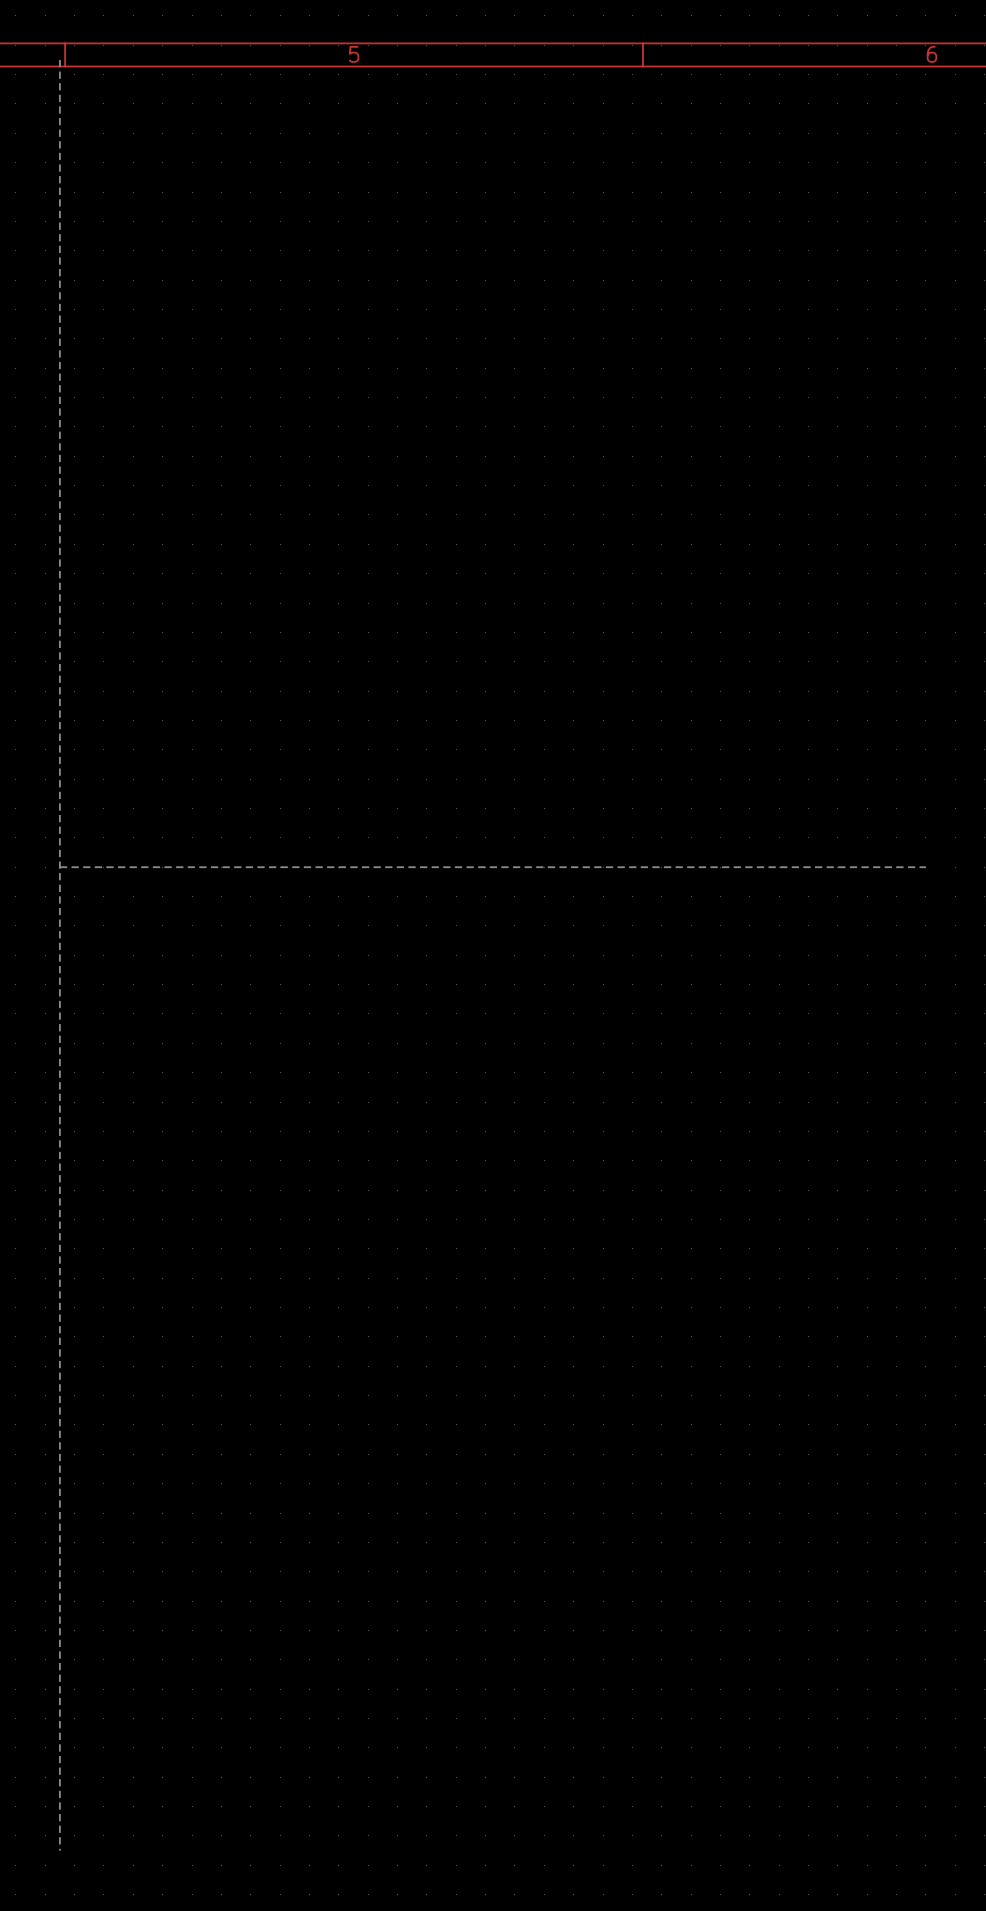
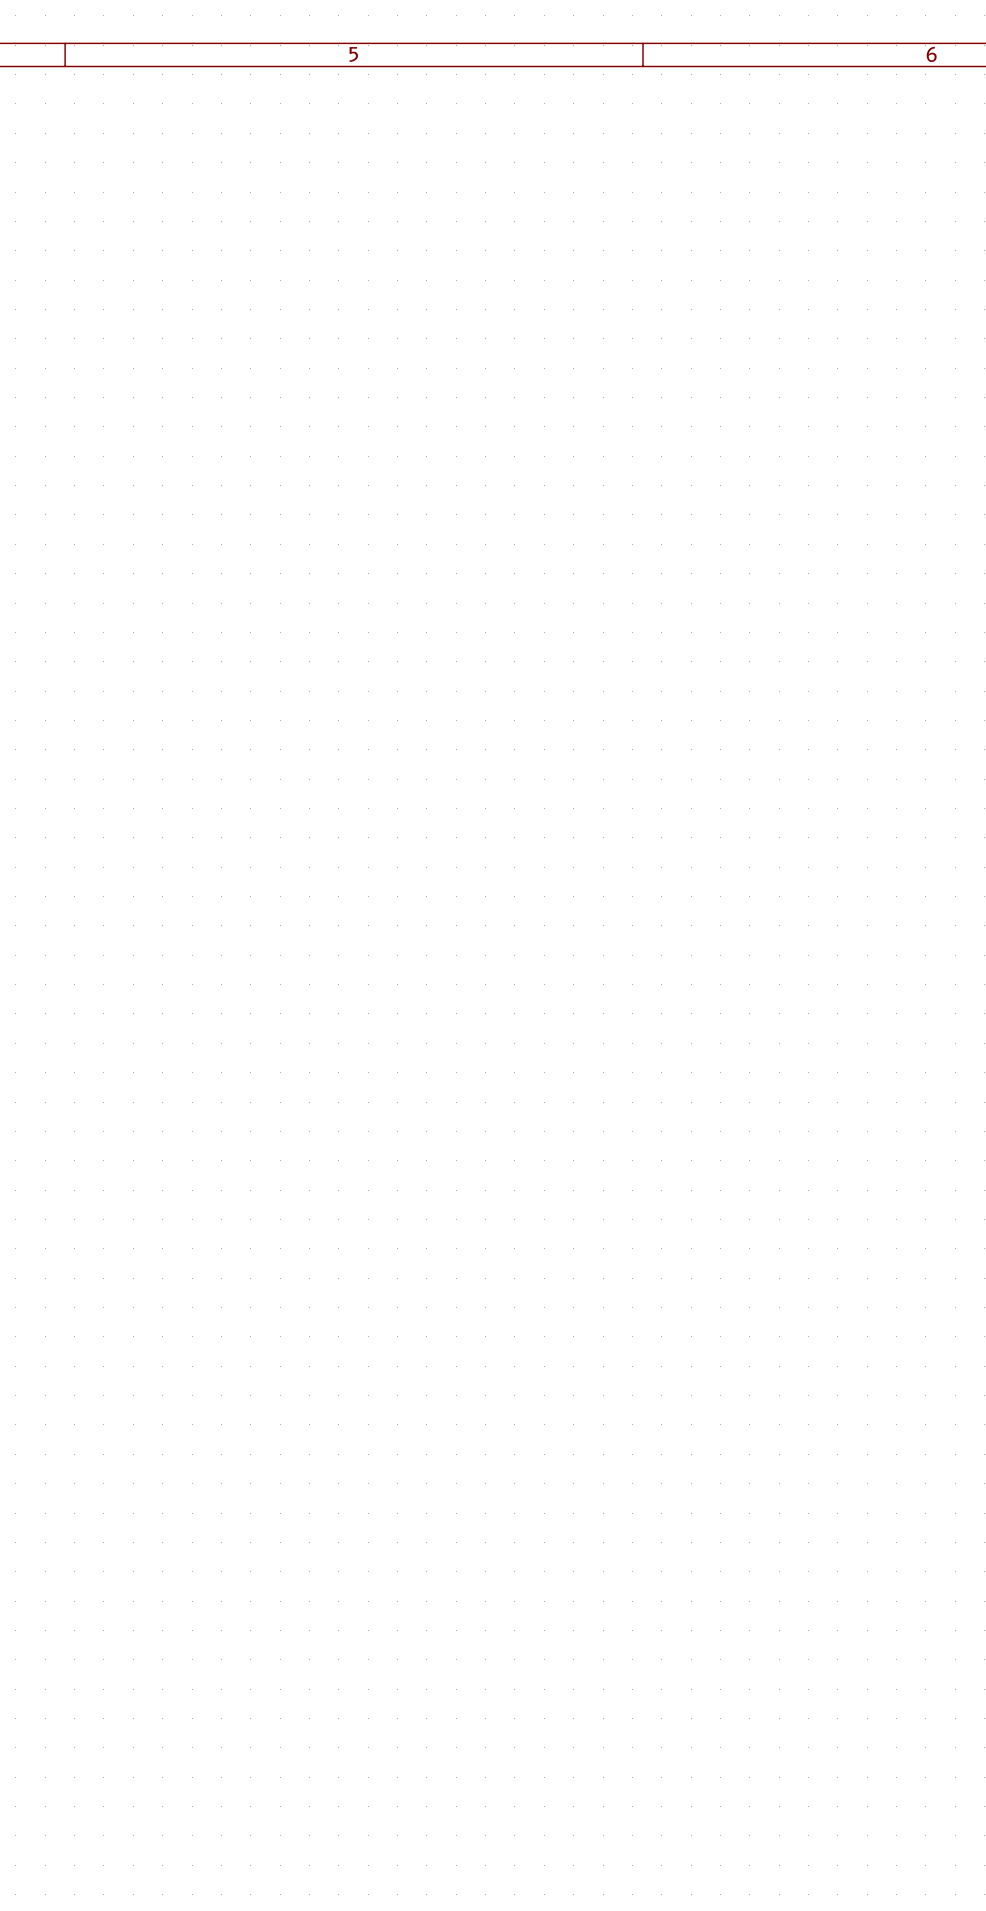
line: (59, 59) (59, 1850) -> none
line: (59, 867) (925, 867) -> none

